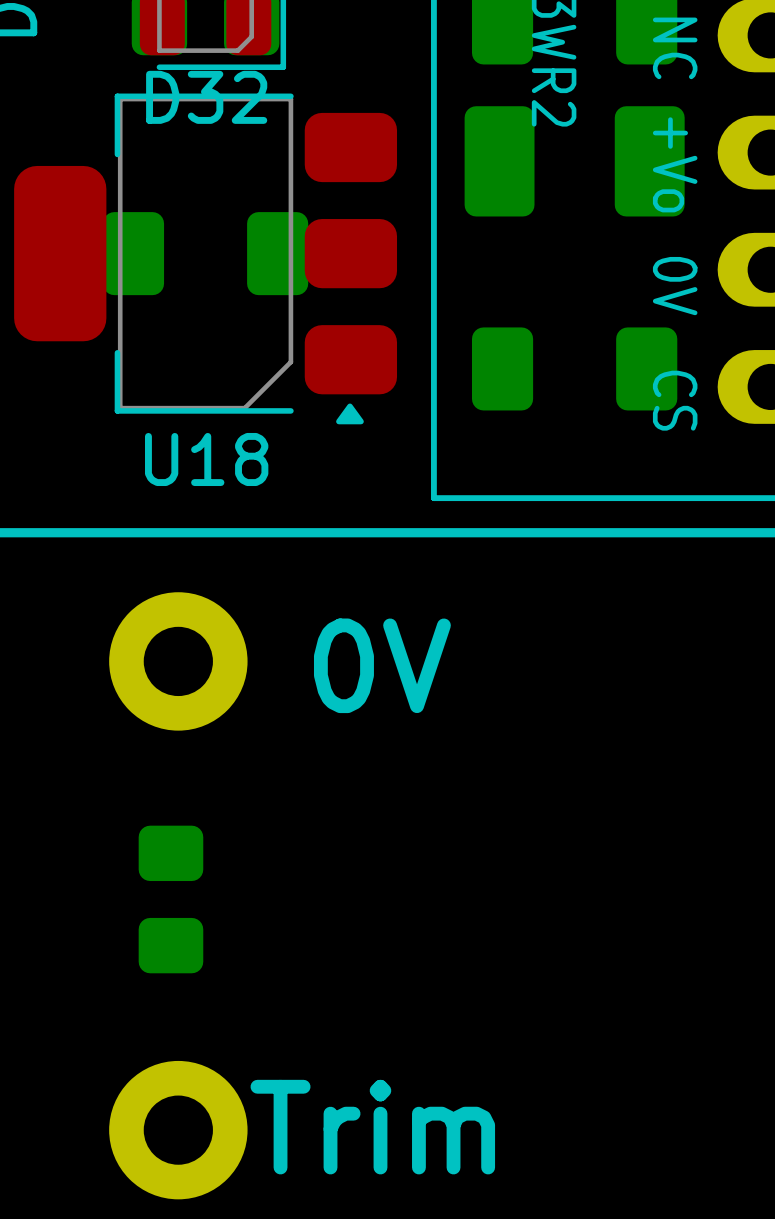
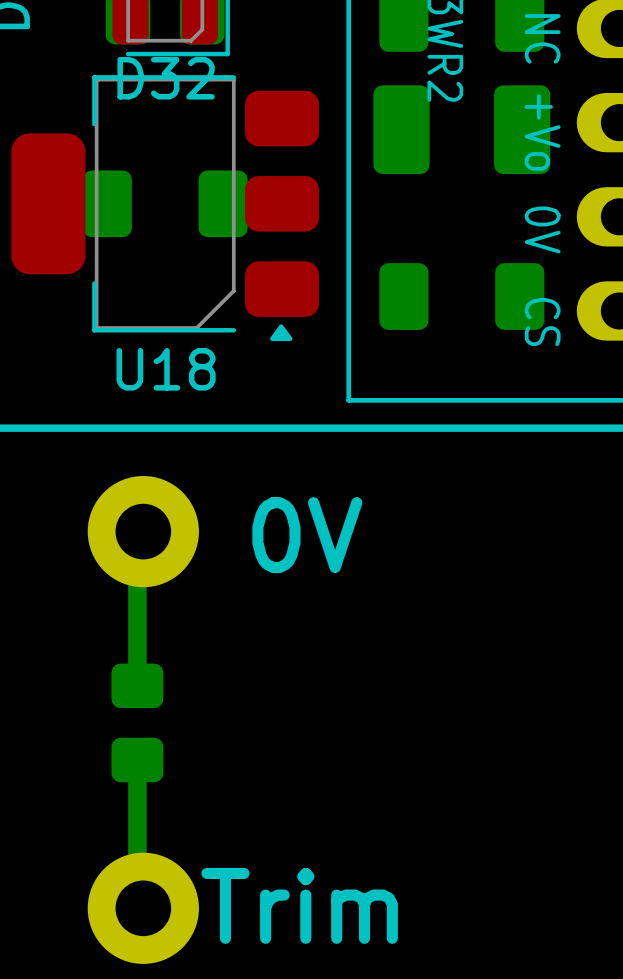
bottom track: none -> (143, 531) (137, 537) (137, 685)
bottom track: none -> (137, 760) (137, 902) (143, 908)

